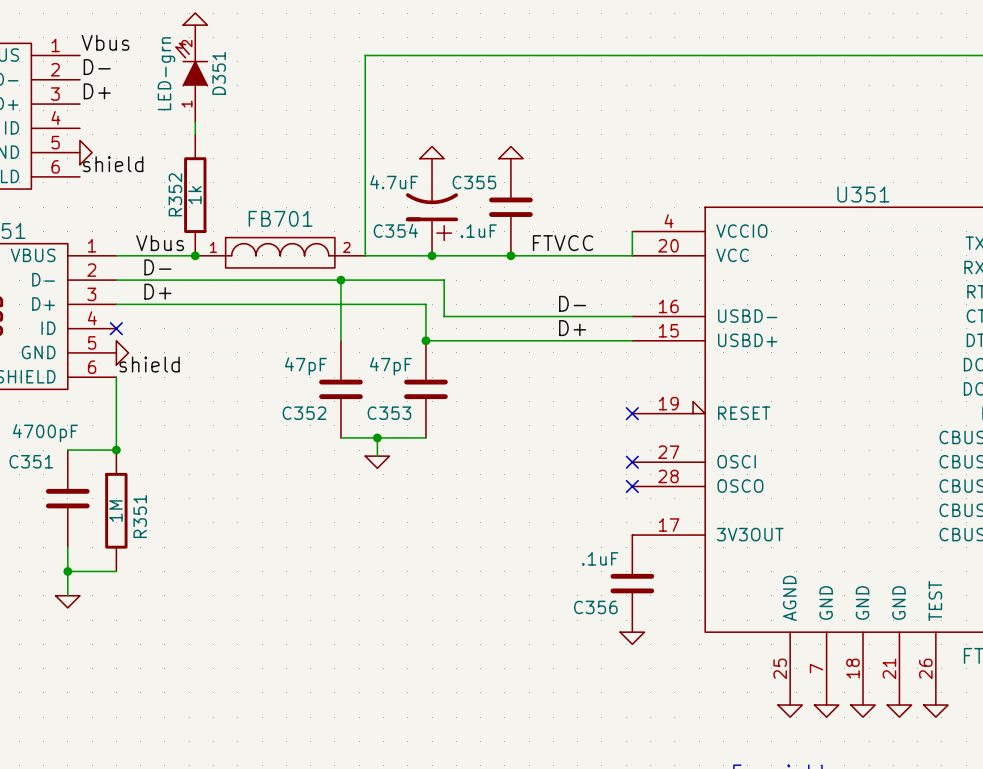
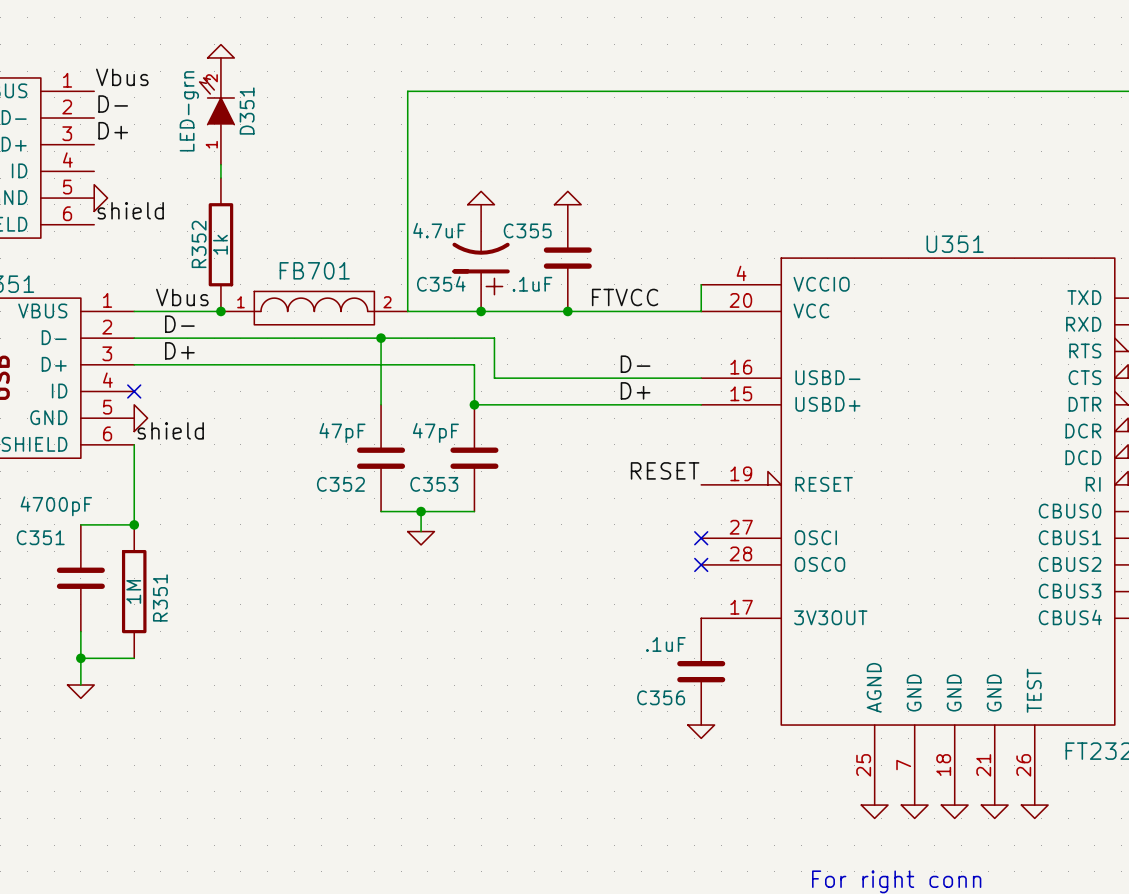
label: none -> RESET (665, 470)
no-connect mark: (632, 413) -> none

